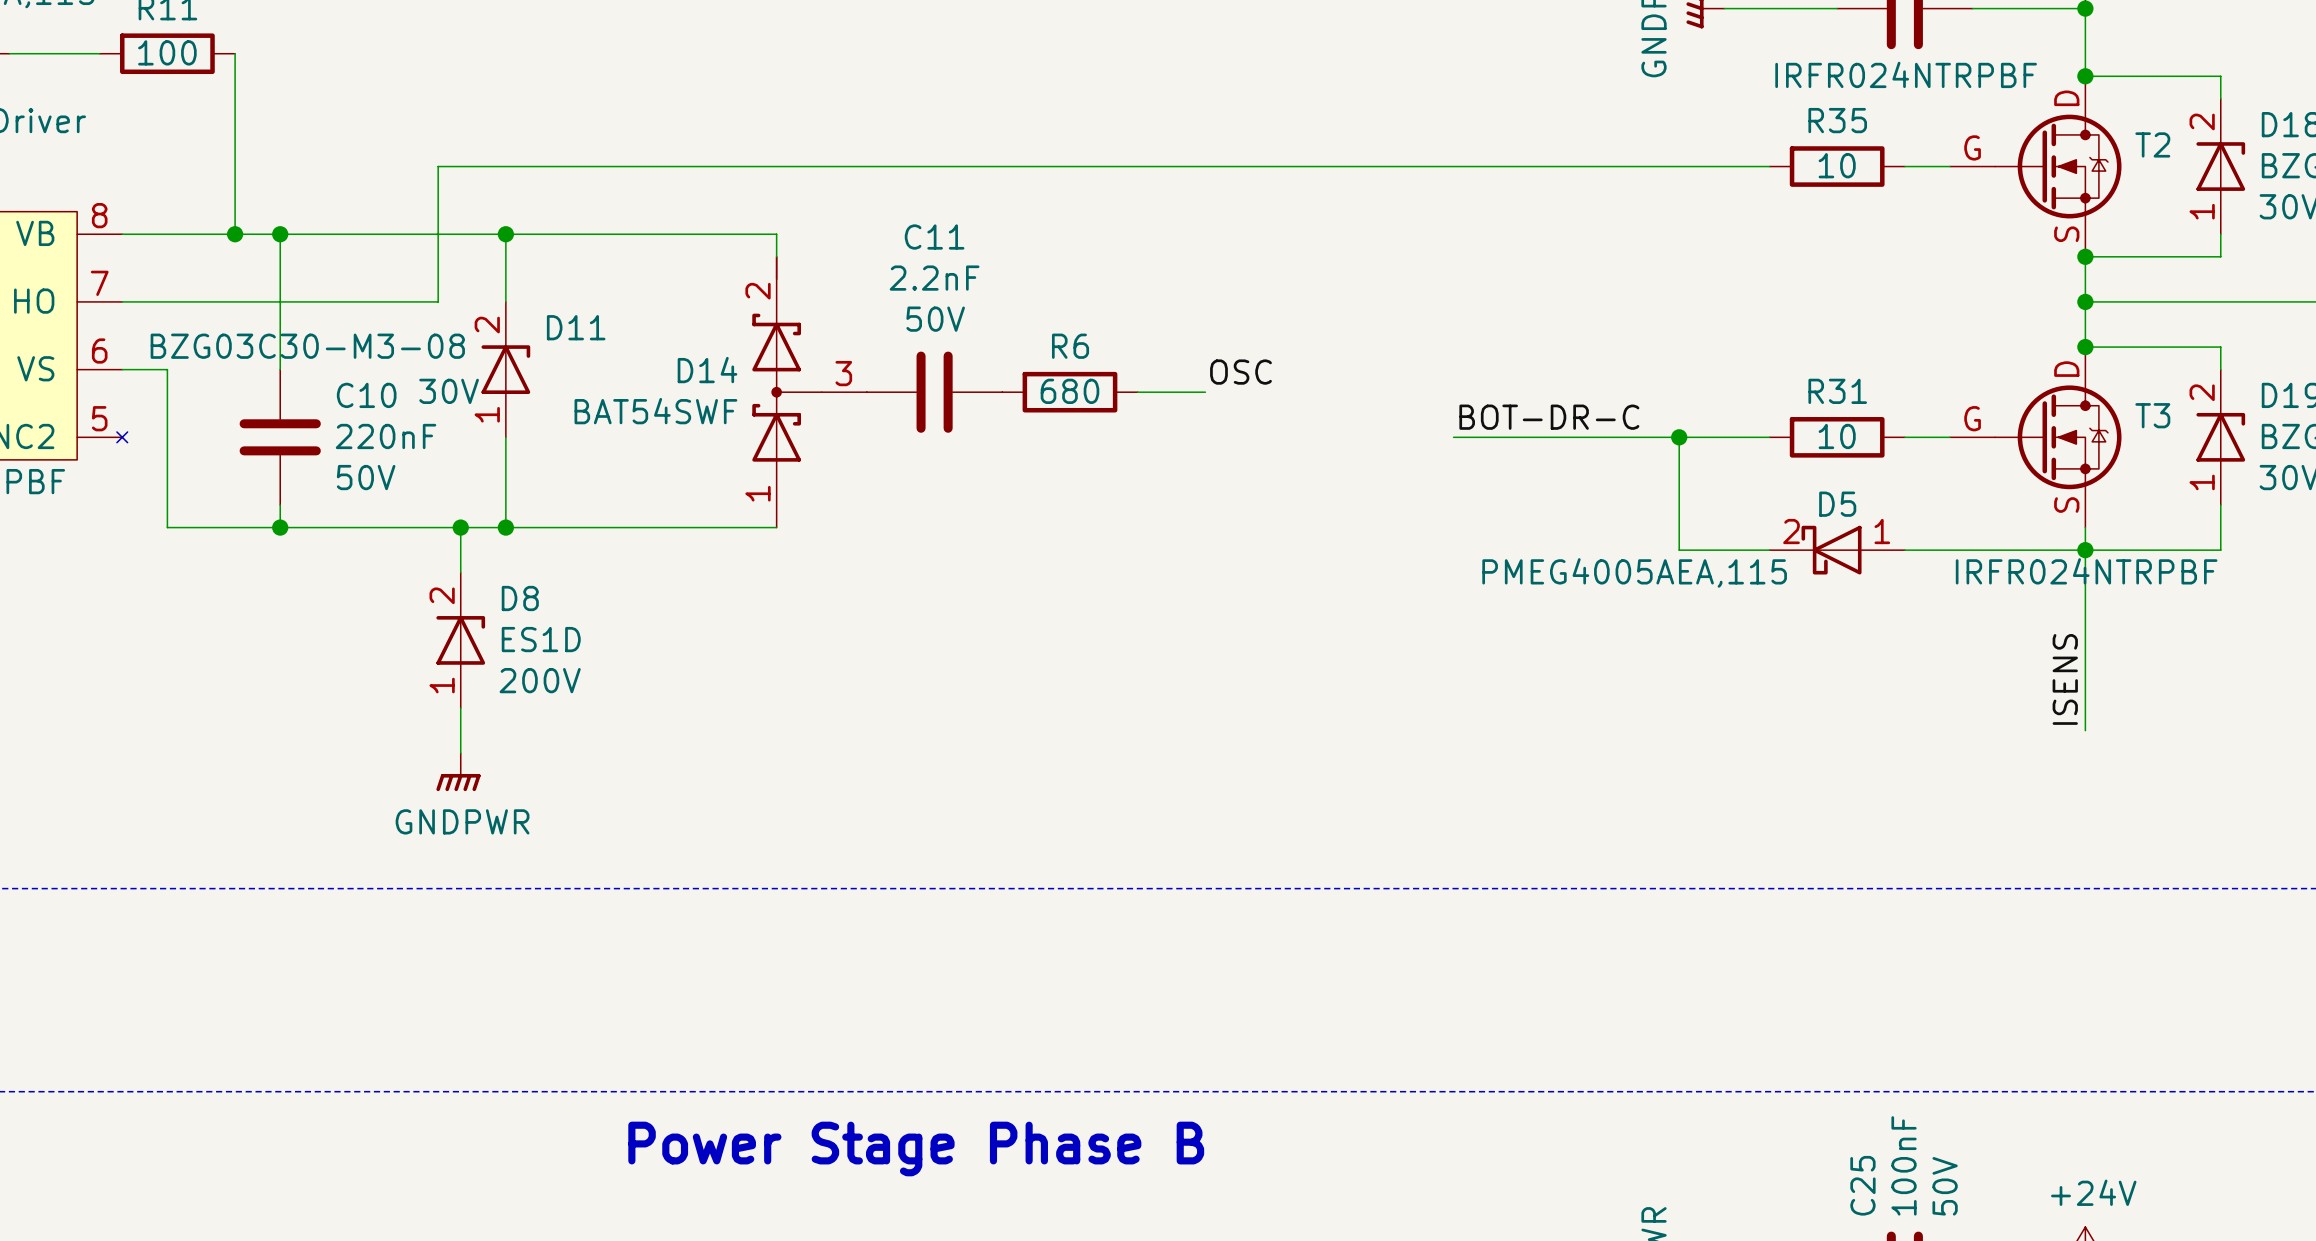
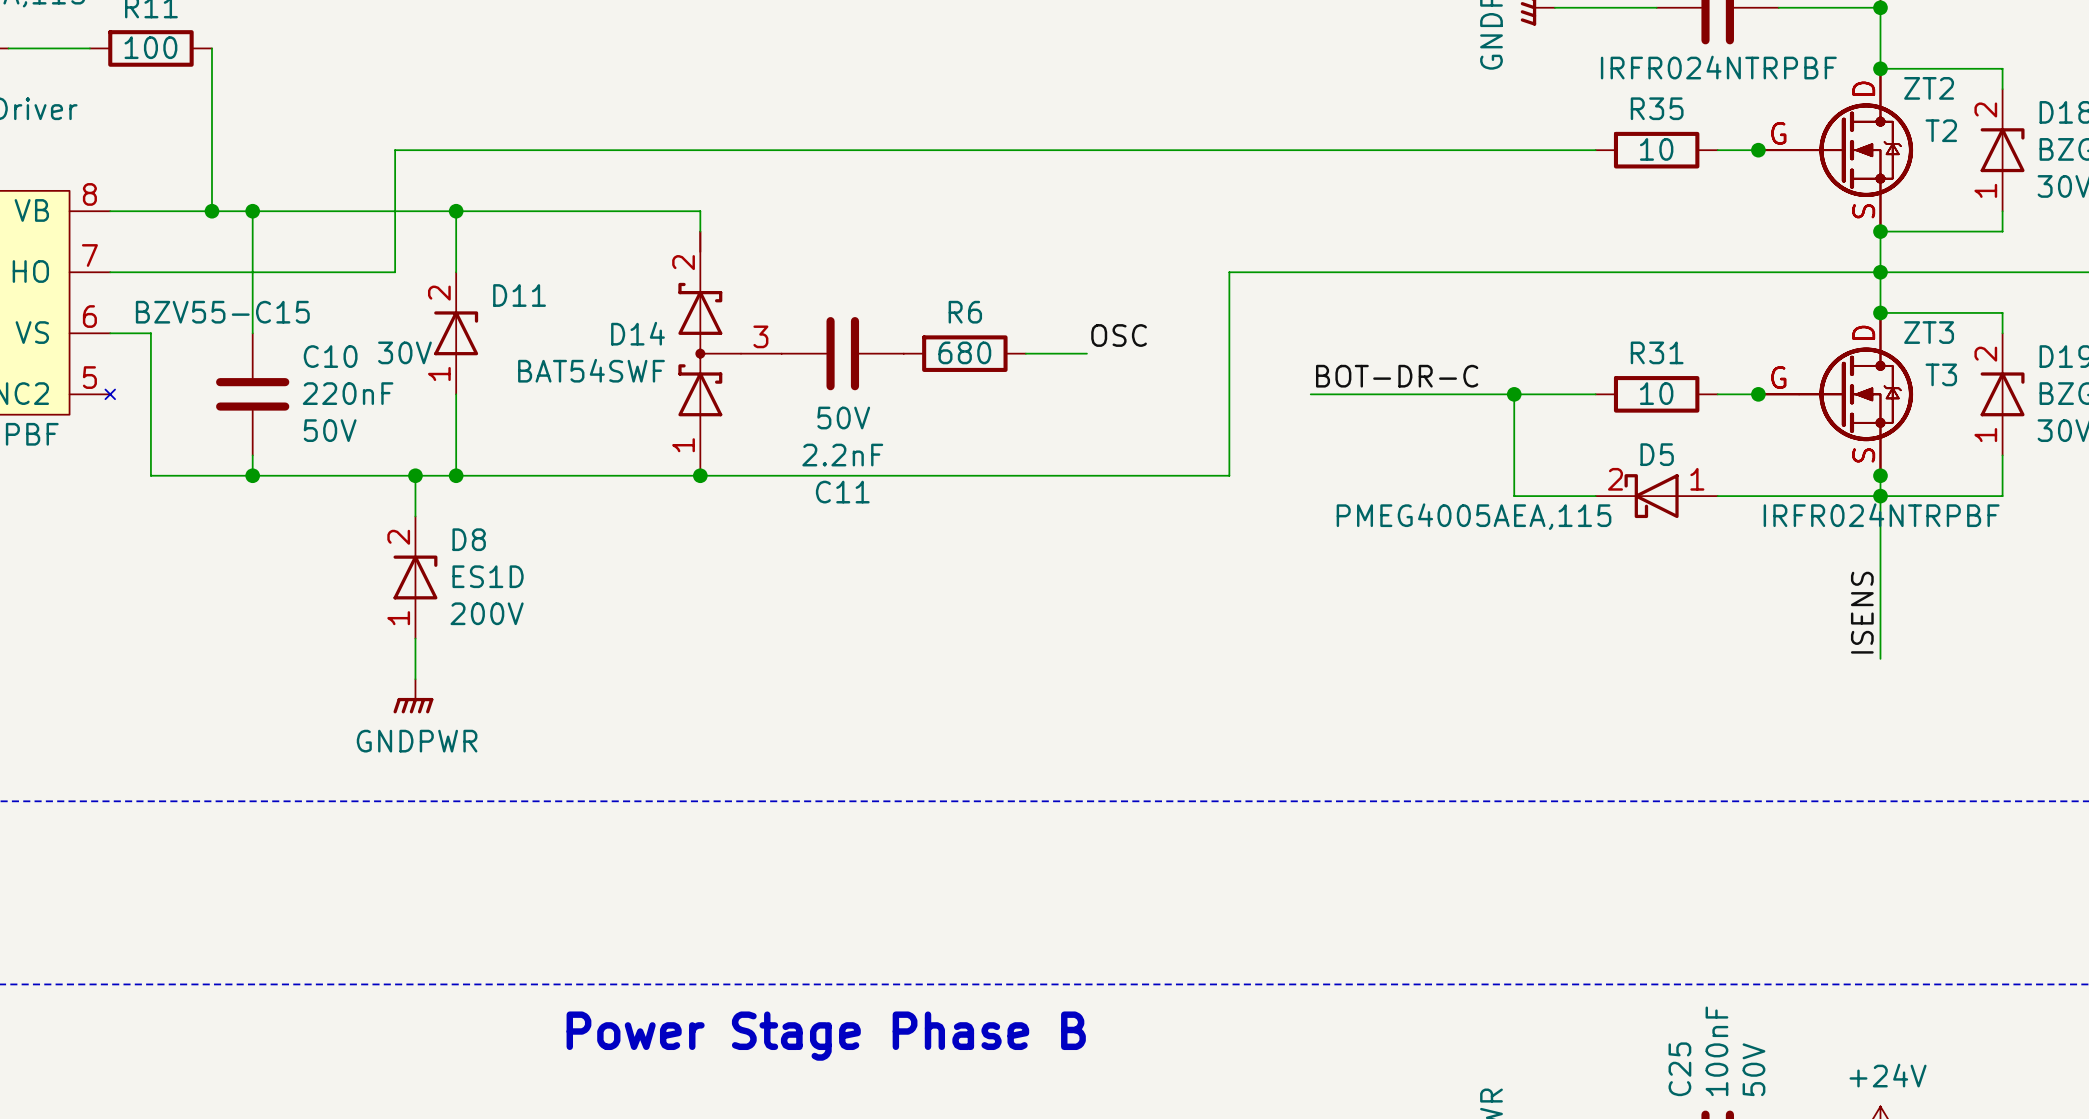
junction: none -> (1758, 150)
ZT2: none -> (1835, 150)
C11 name position: C11 (934, 237) -> C11 (842, 492)
C11 text position: 2.2nF (934, 278) -> 2.2nF (842, 455)
wire: none -> (1880, 272) (1229, 272) (1229, 475) (700, 475)
C11 text position: 50V (935, 319) -> 50V (843, 418)
D11 text: BZG03C30-M3-08 (307, 346) -> BZV55-C15 (222, 312)
junction: none -> (1758, 394)
ZT3: none -> (1835, 394)
junction: none -> (700, 475)
junction: none -> (1880, 475)

